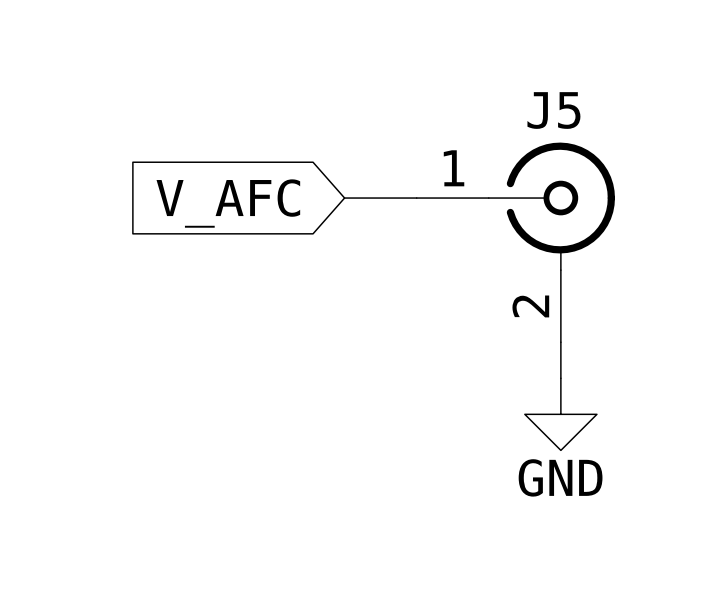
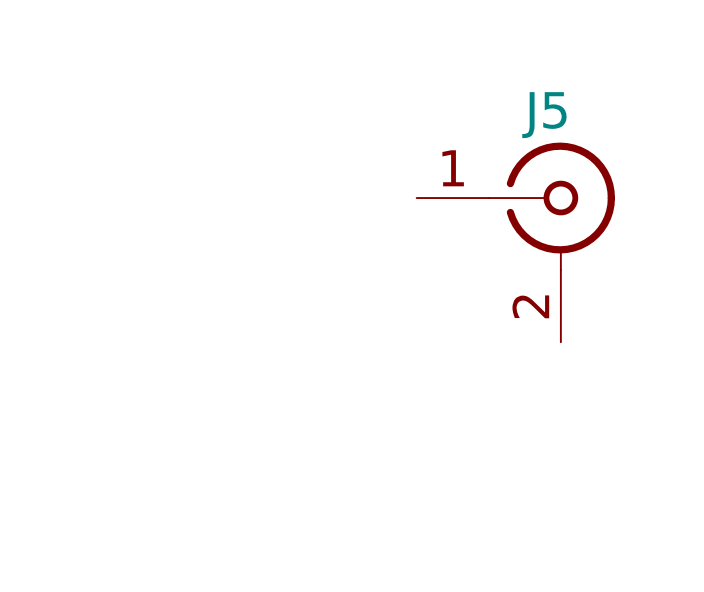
wire: (344, 198) (416, 198) -> none
global label: V_AFC (228, 203) -> none
wire: (560, 342) (560, 378) -> none
power symbol: GND (560, 414) -> none

